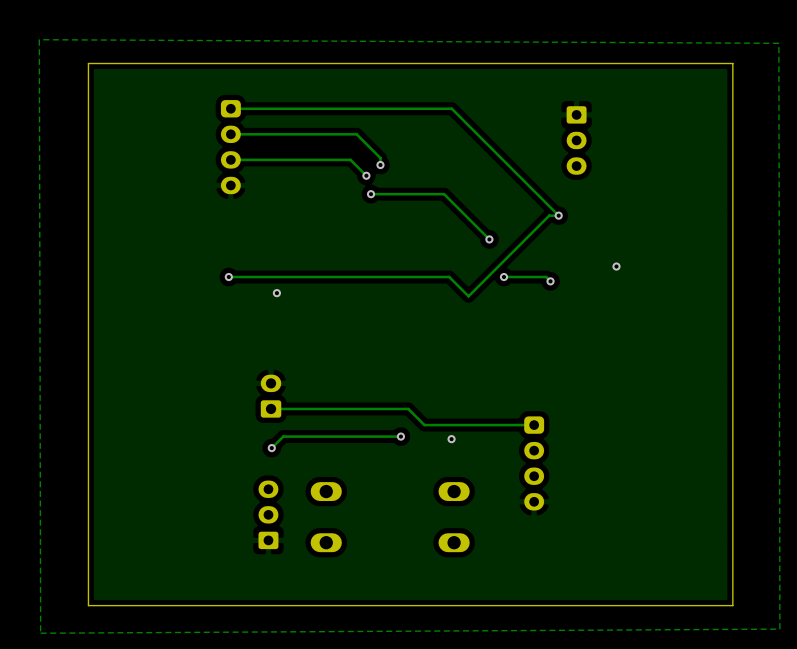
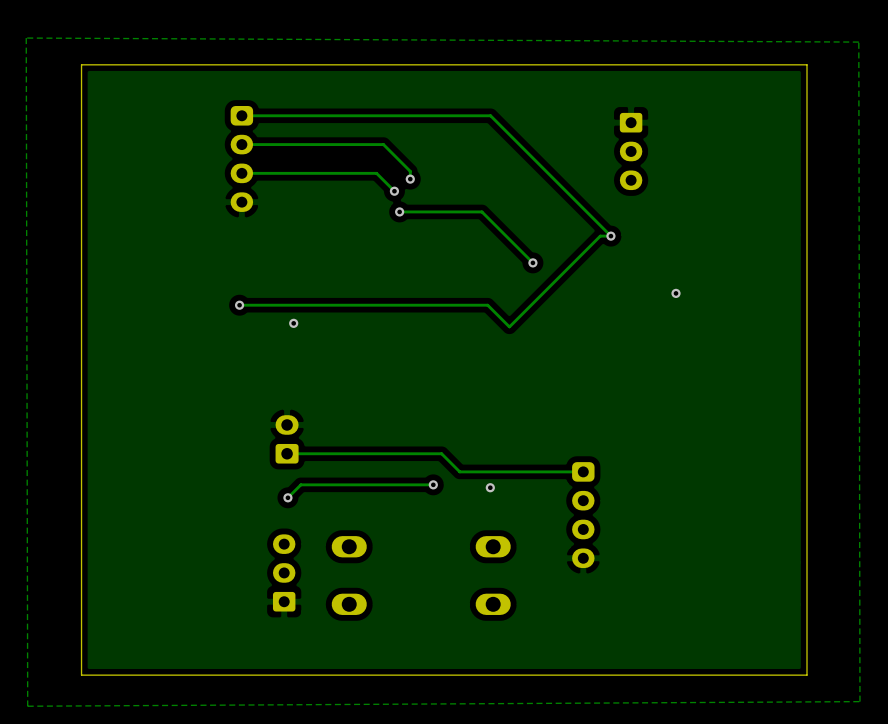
track: (503, 277) (546, 277) (550, 281) -> none
via: (503, 277) -> none
via: (550, 281) -> none

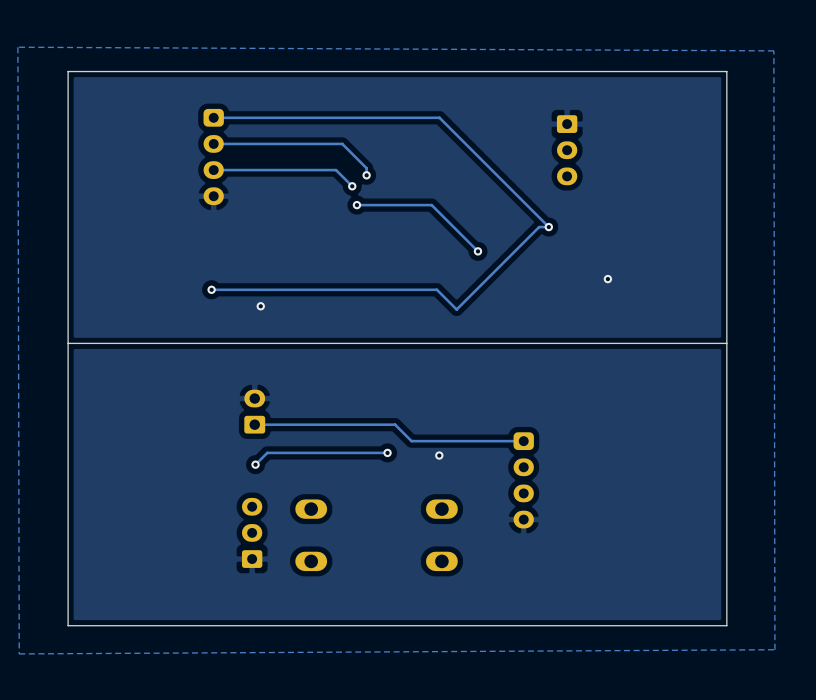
board edge: none -> (726, 343) (68, 343)

